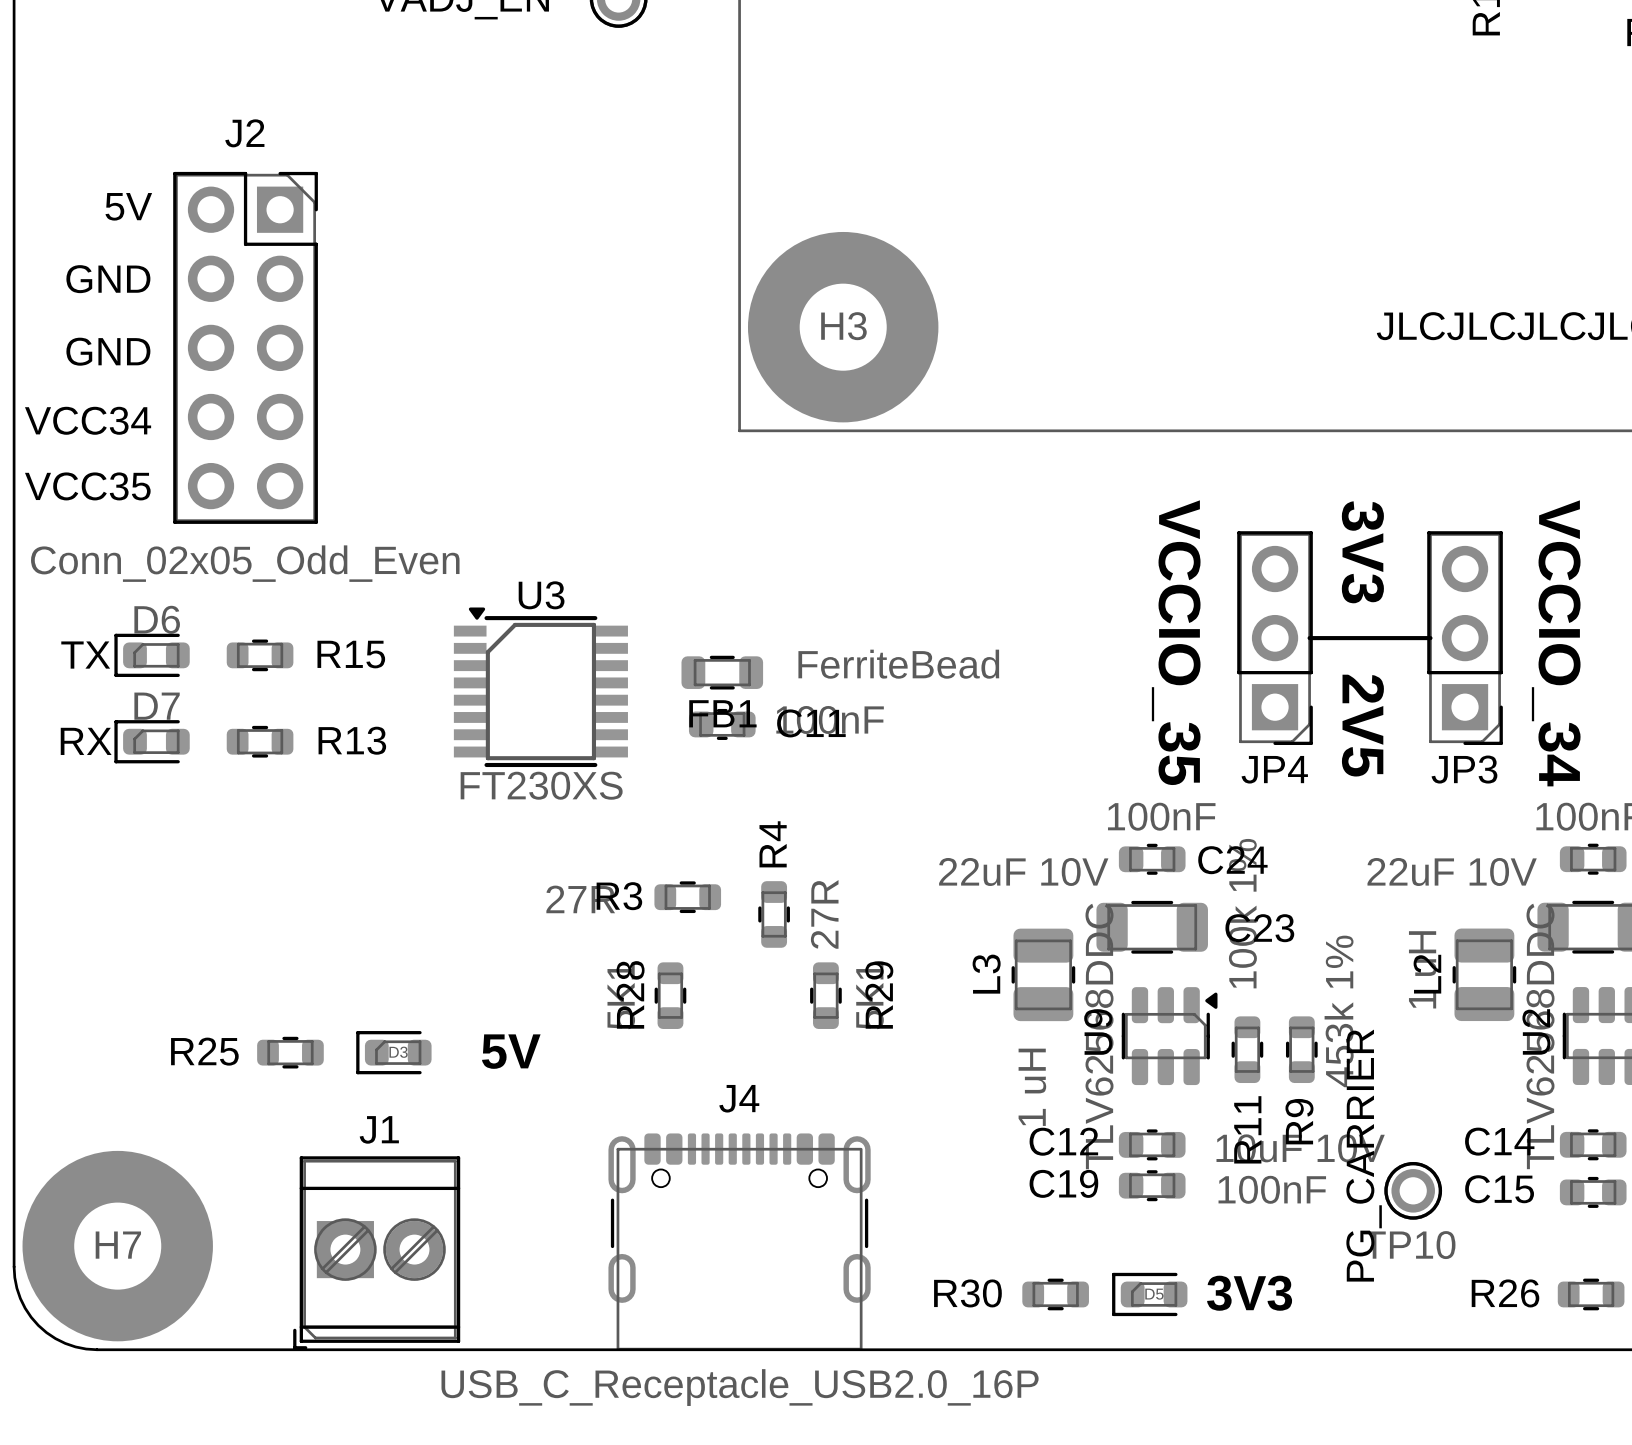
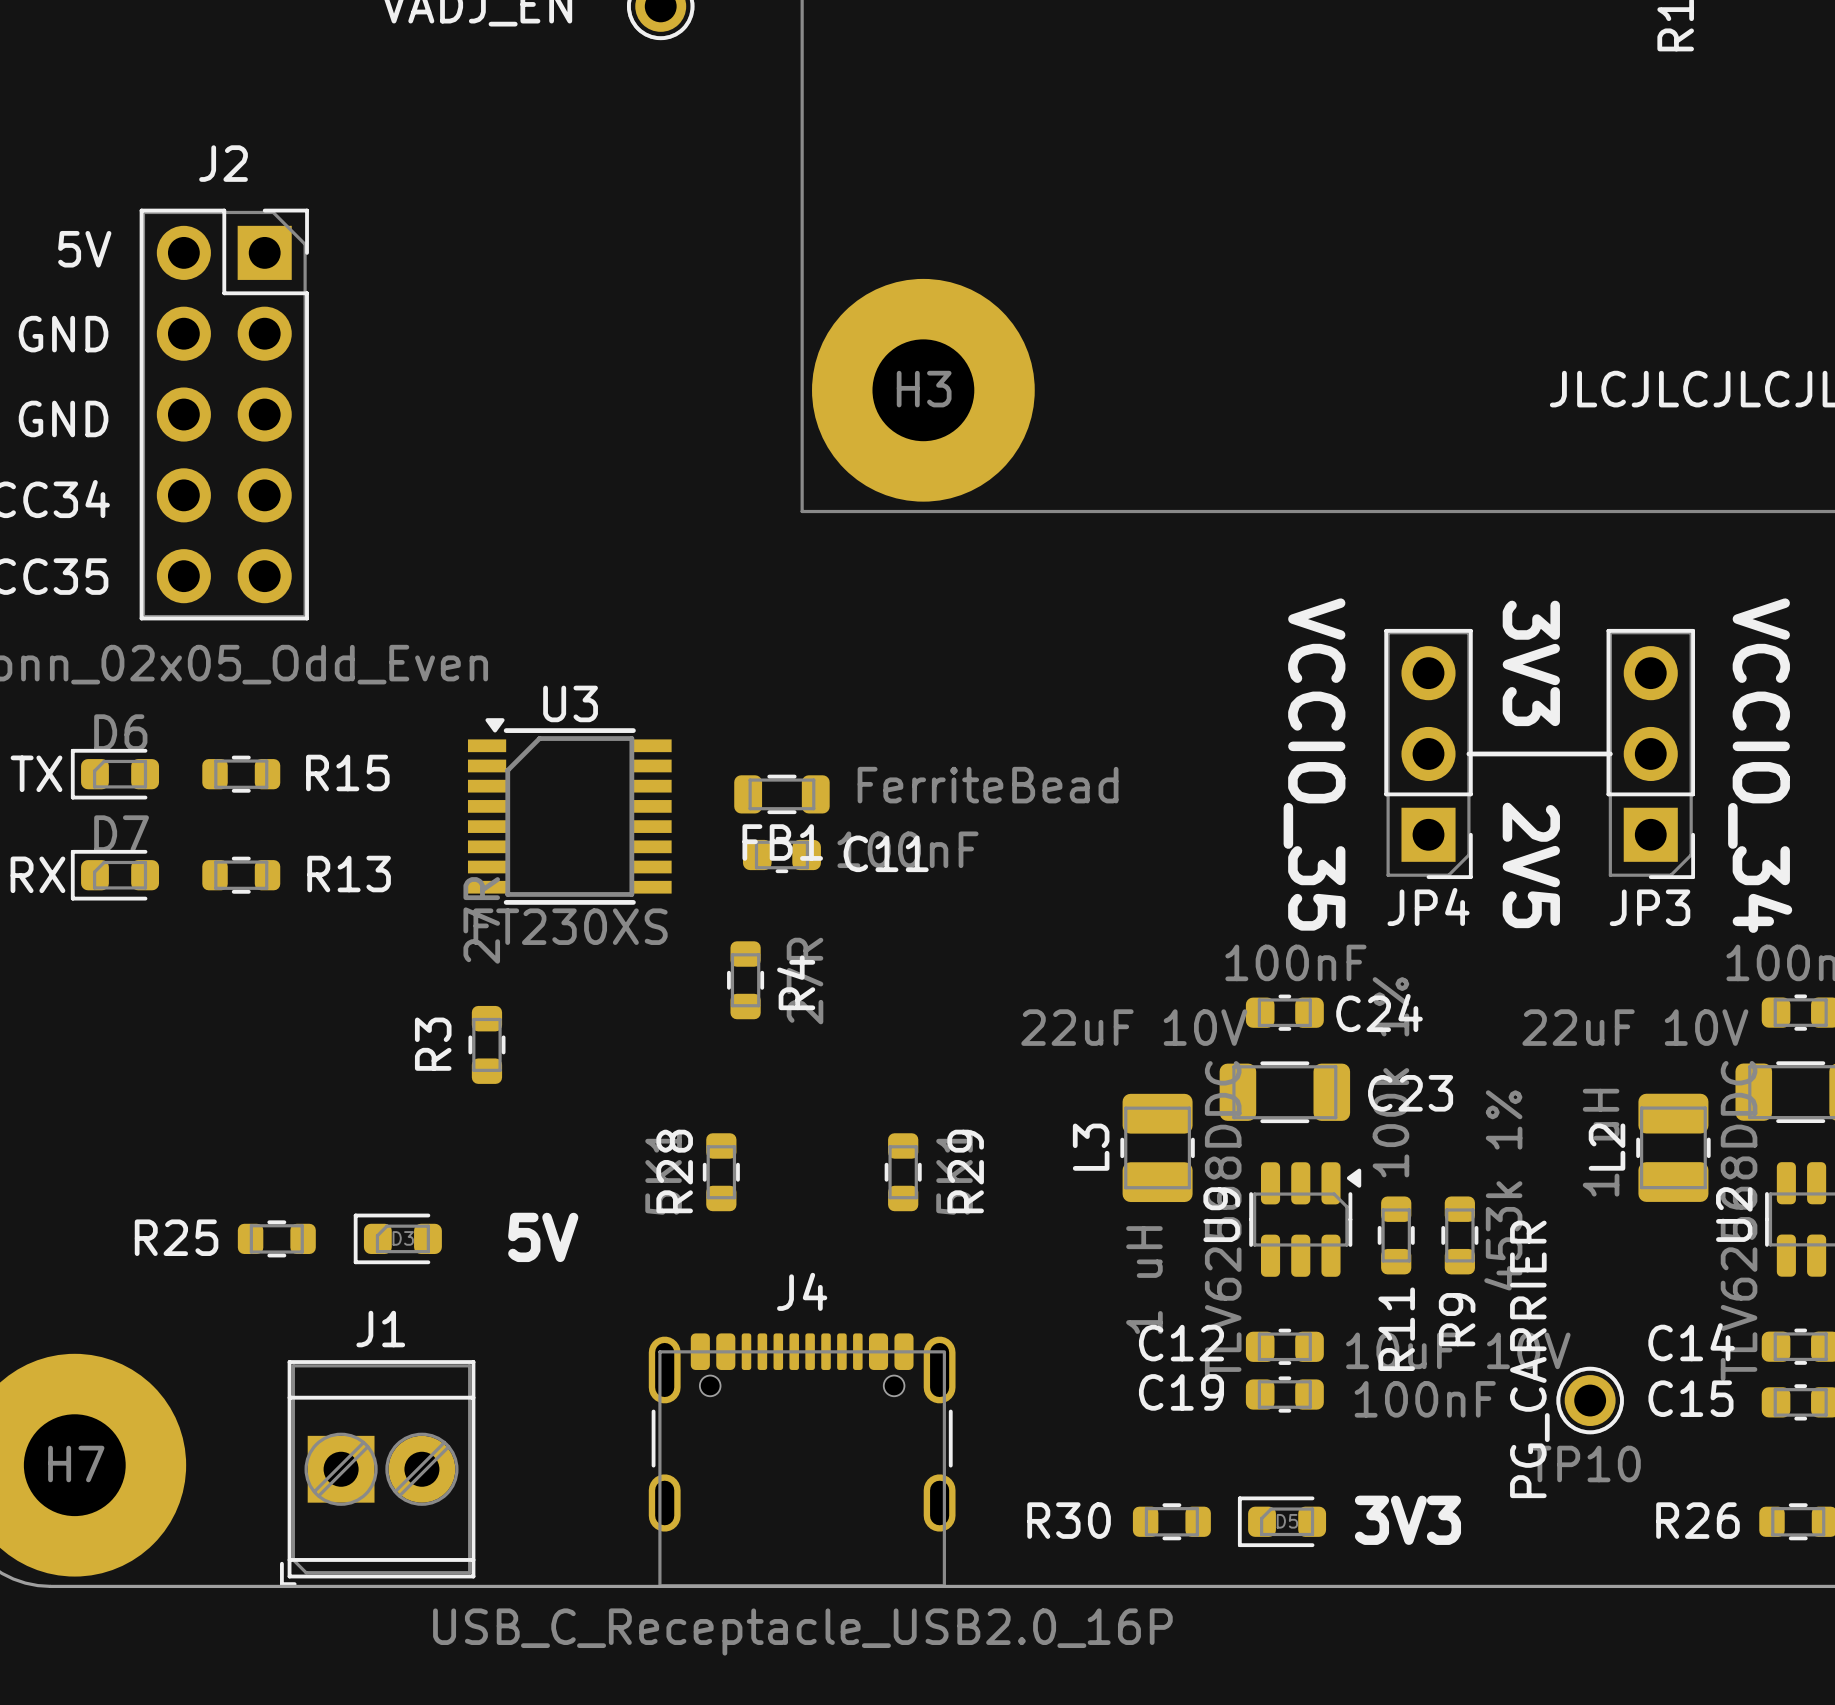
R4 name position: R4 (773, 844) -> R4 (796, 982)
R3 rotation: 0° (687, 897) -> 90° clockwise (486, 1044)
R3 position: (687, 897) -> (486, 1044)
R4 position: (774, 914) -> (745, 980)

